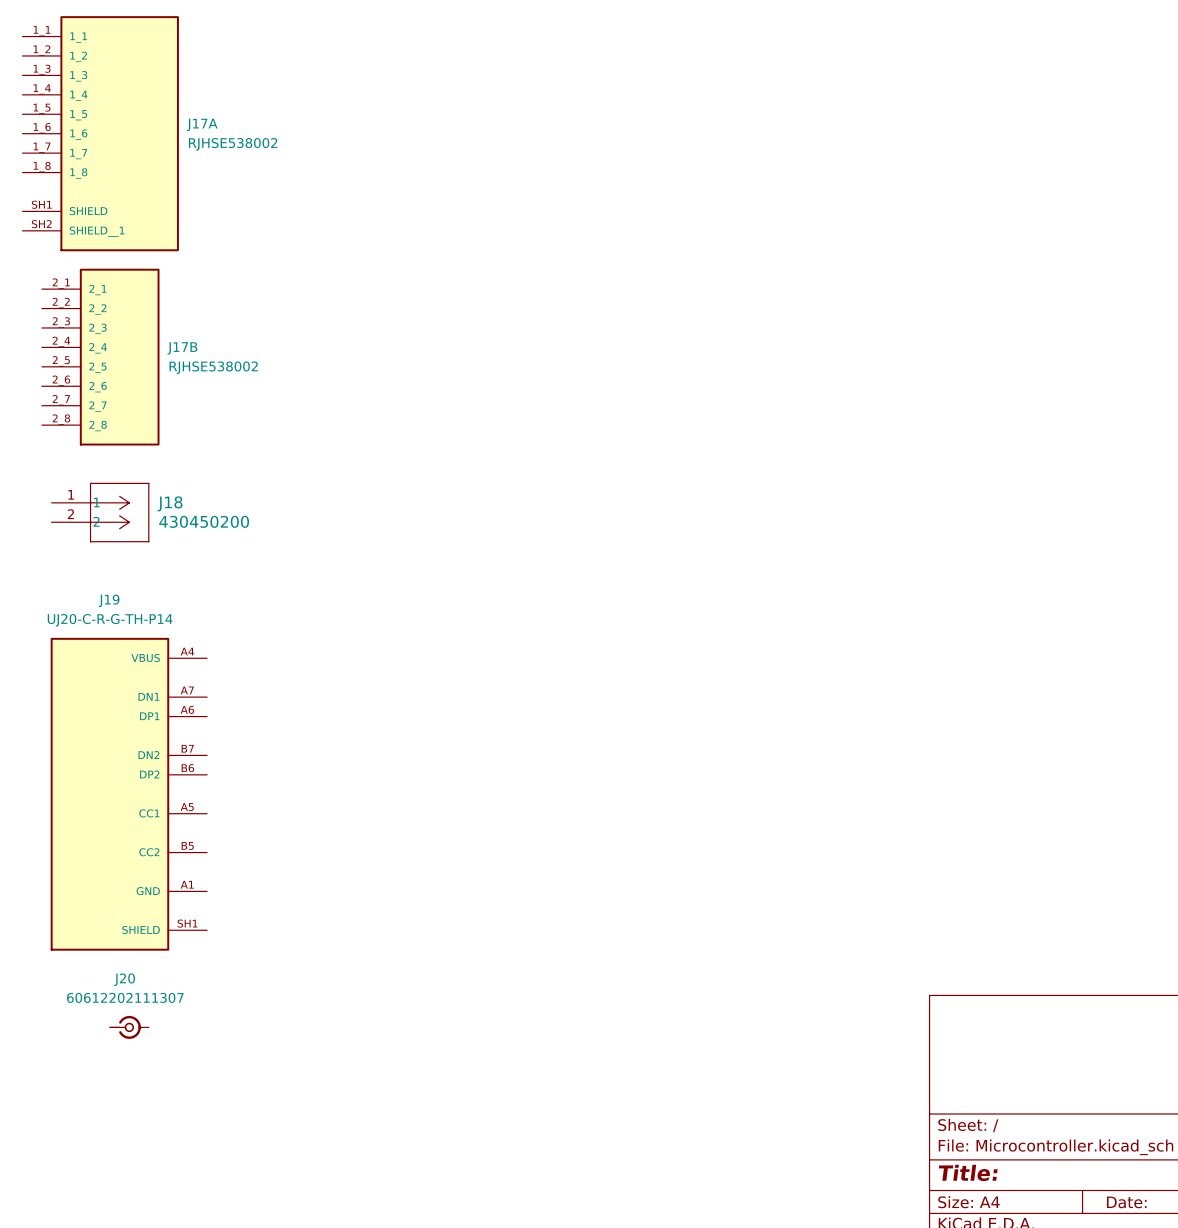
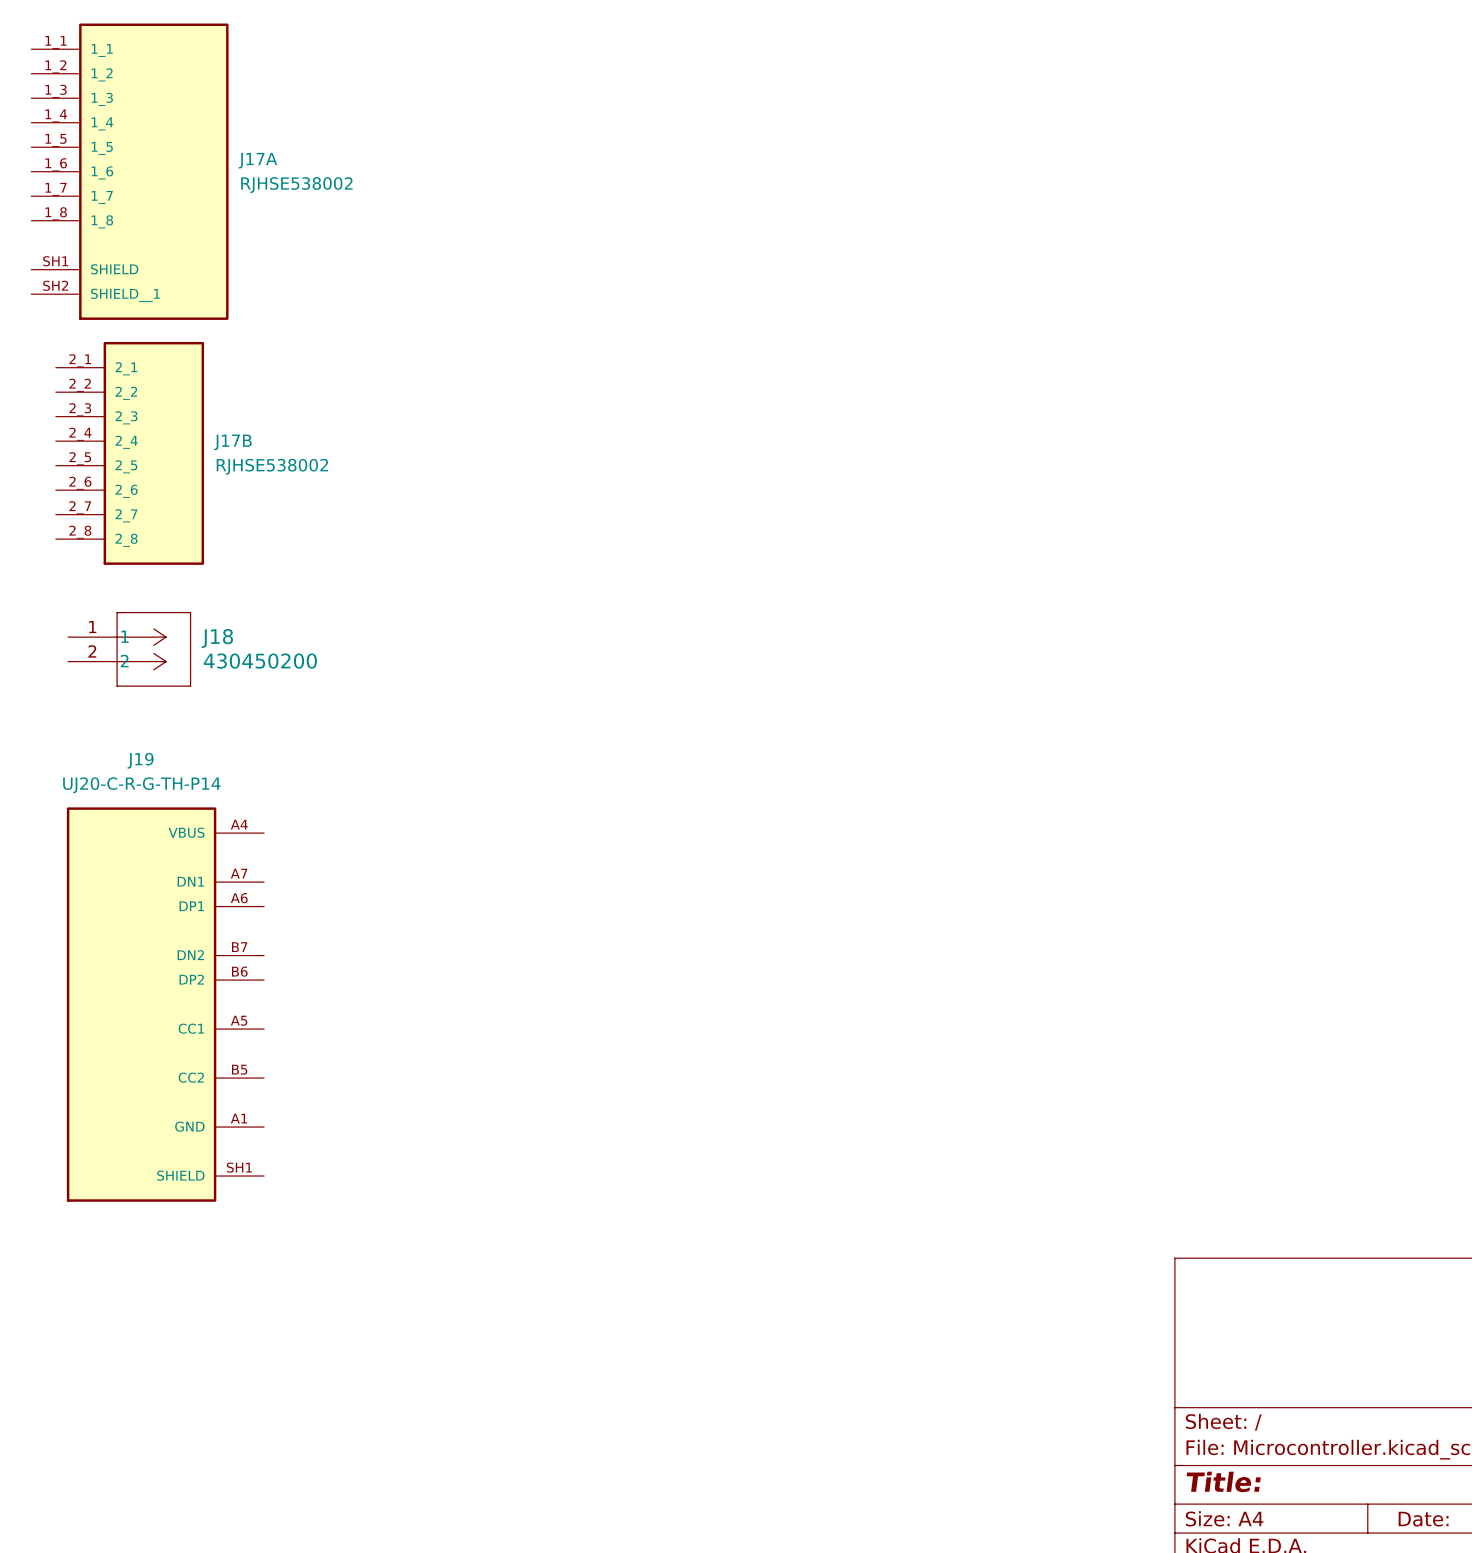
J20: 60612202111307 (129, 1027) -> none

